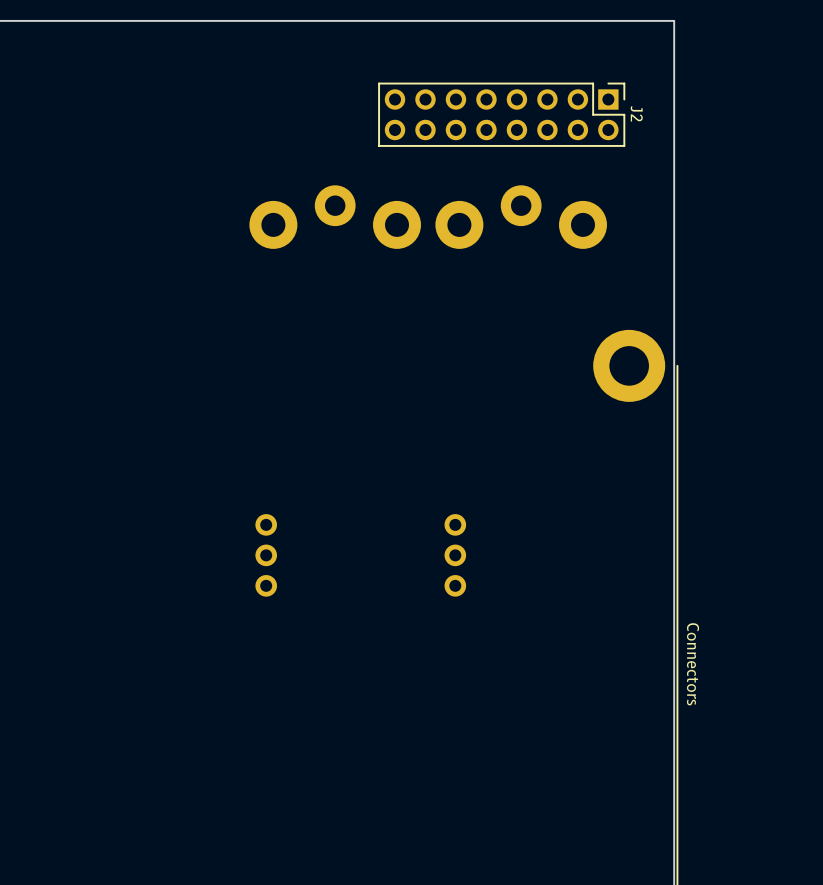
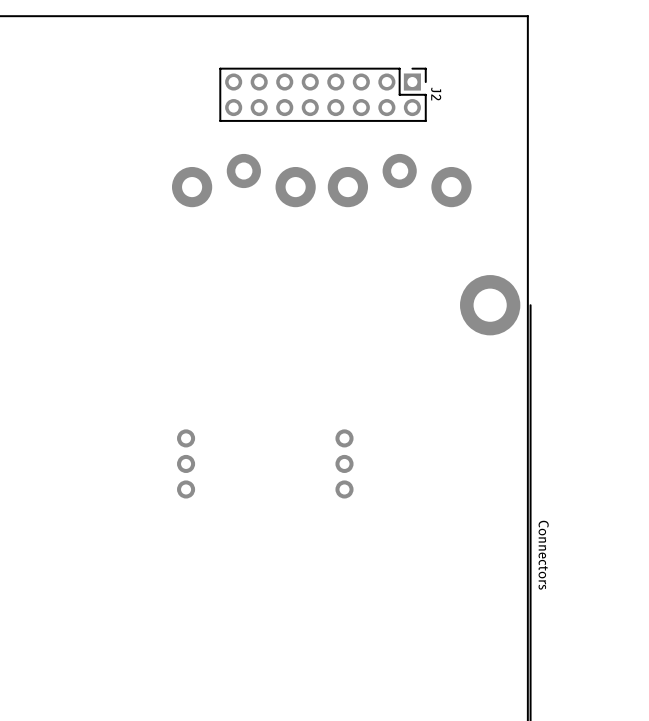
J2 position: (501, 114) -> (323, 94)

